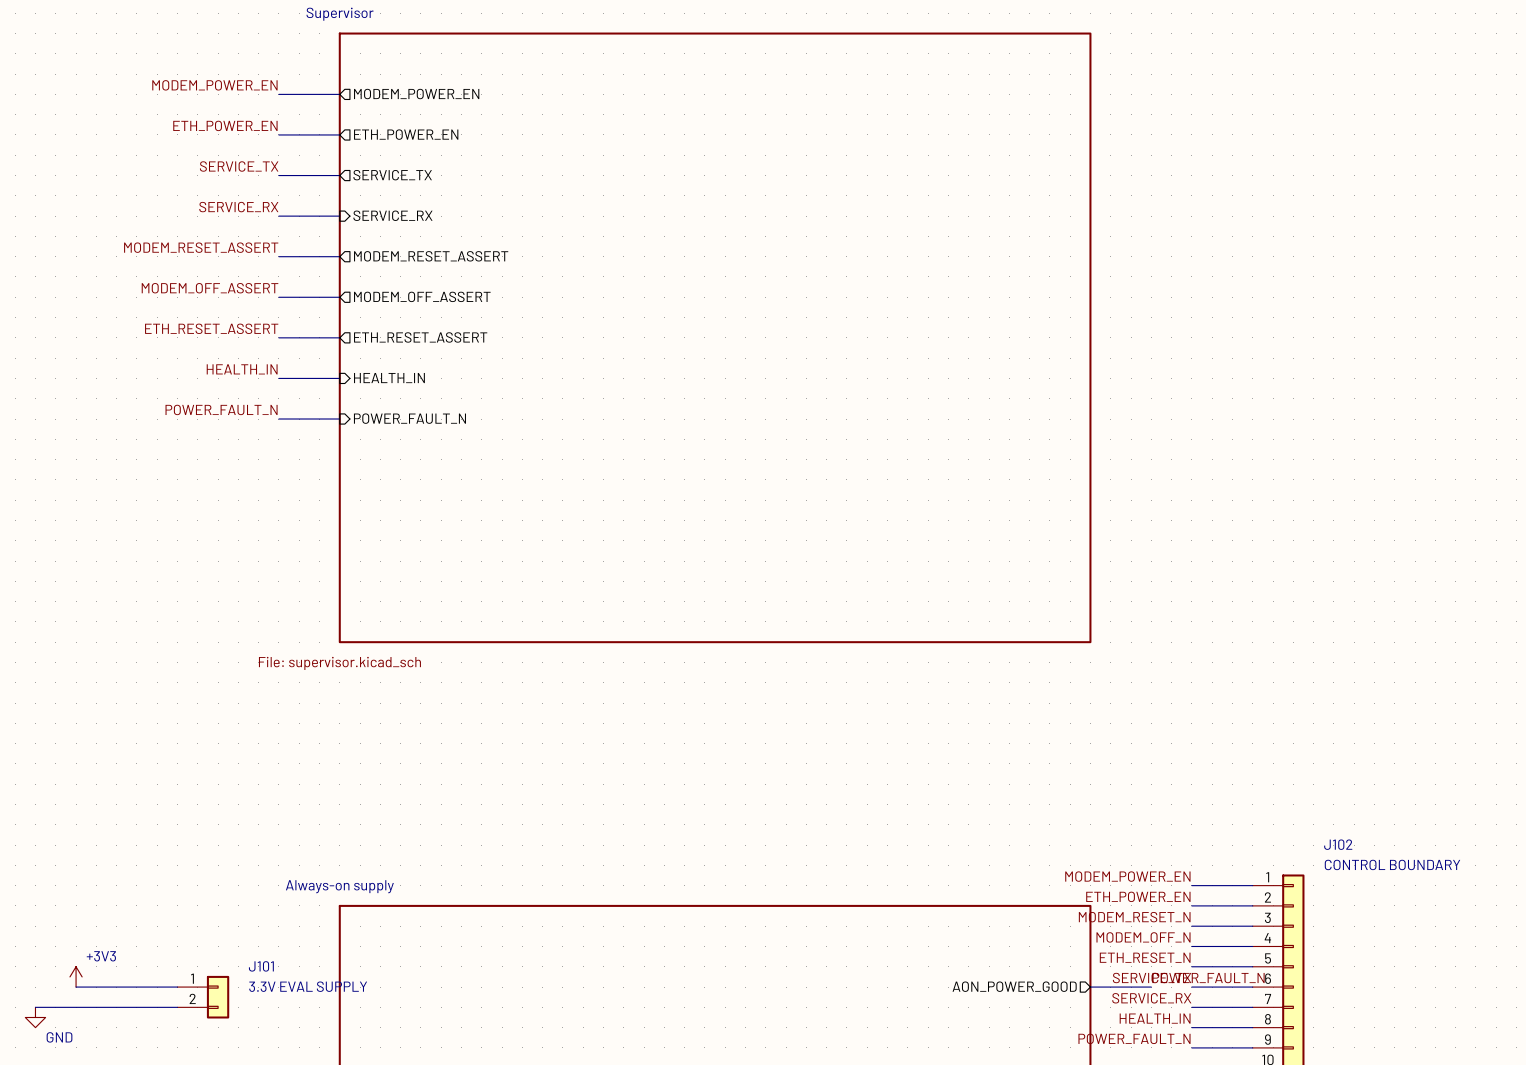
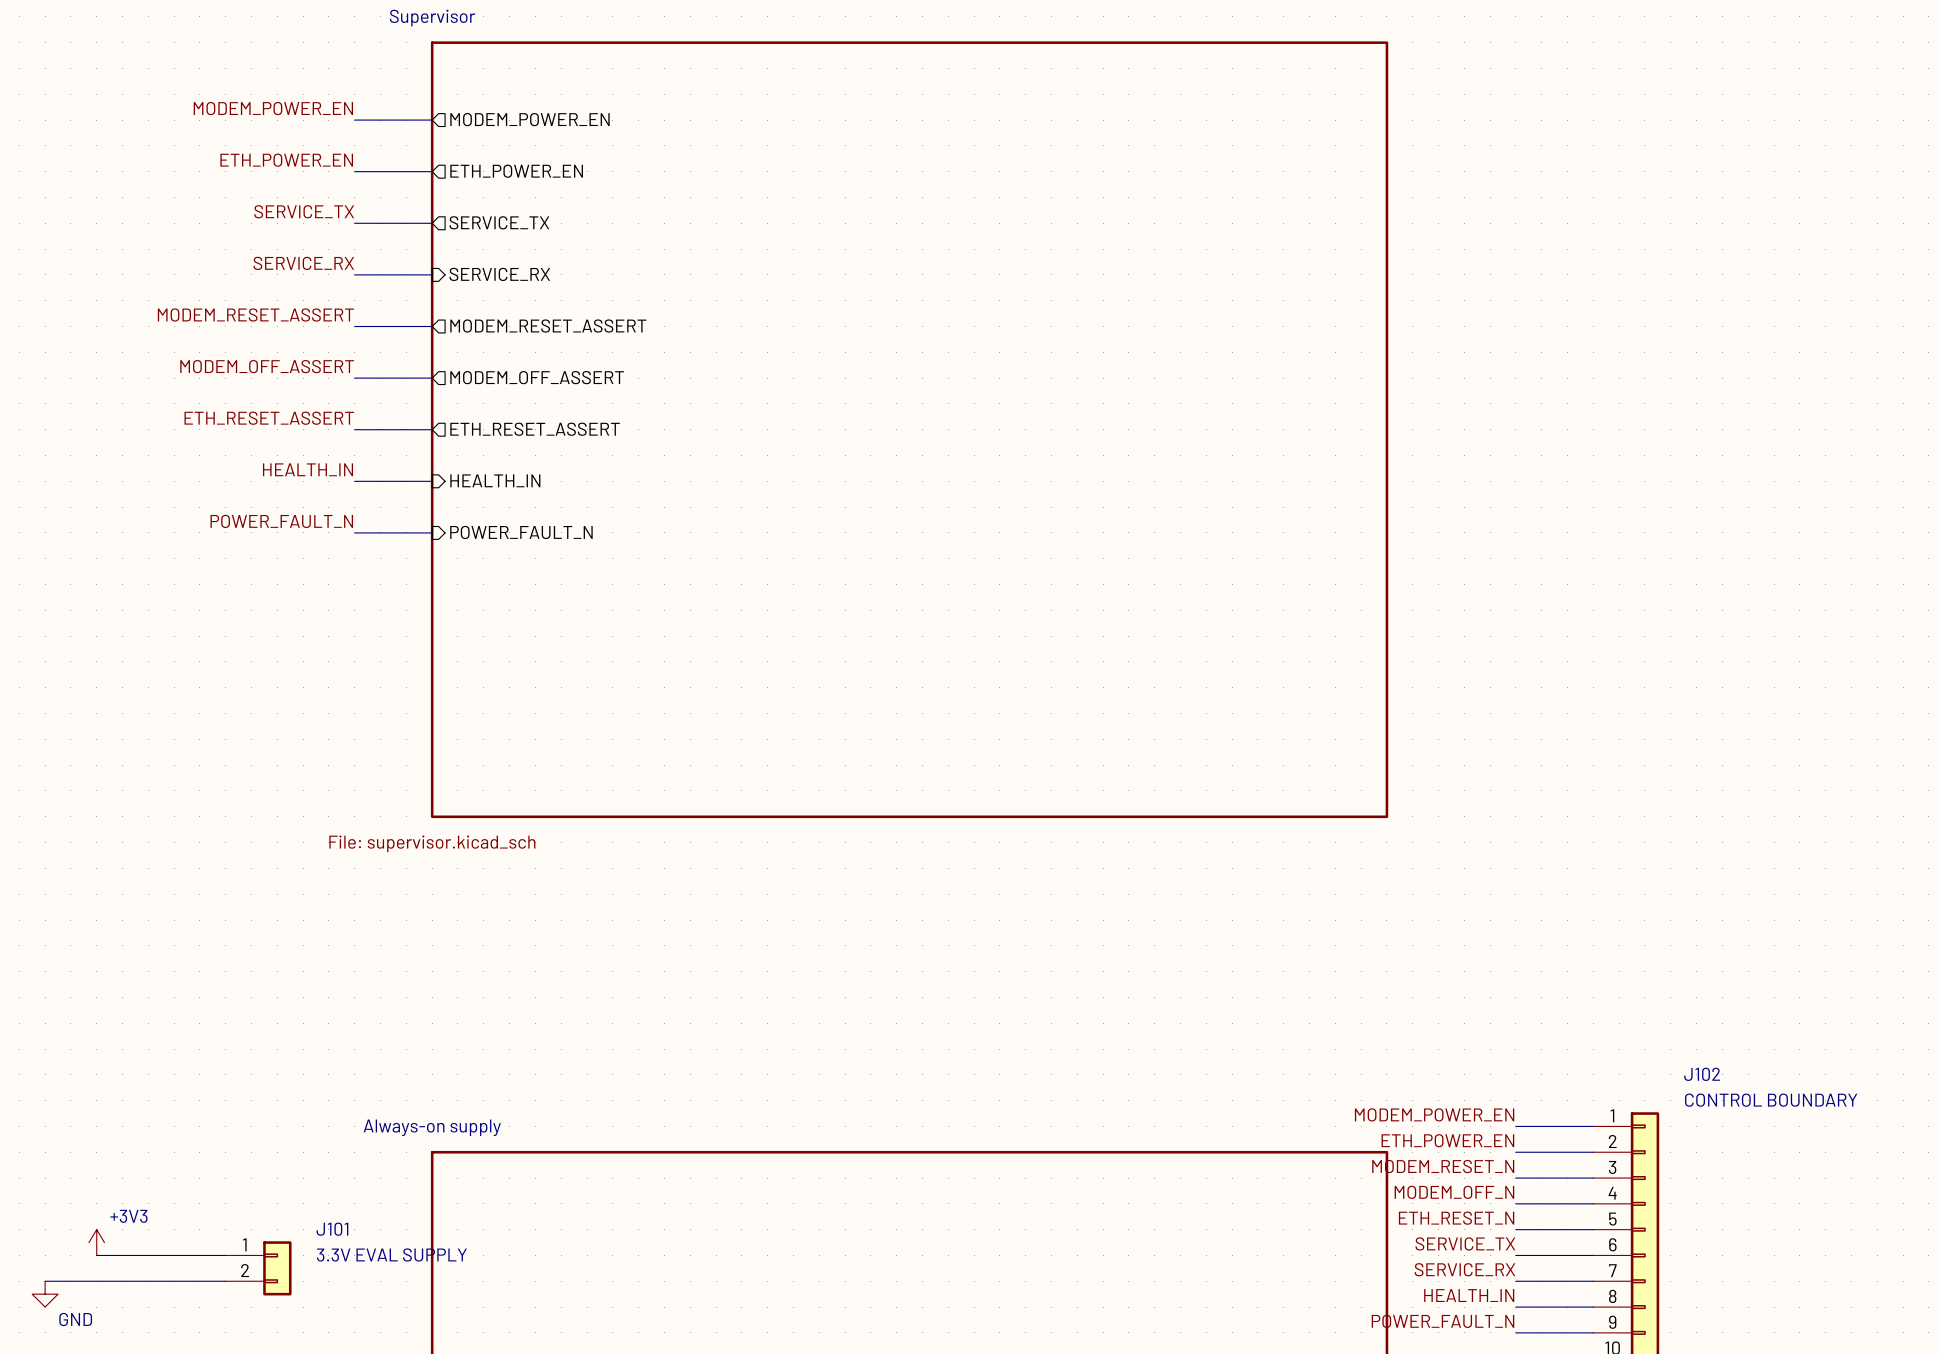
label: POWER_FAULT_N (1208, 978) -> none
sheet pin: AON_POWER_GOOD (1014, 986) -> none
wire: (1090, 987) (1151, 987) -> none

